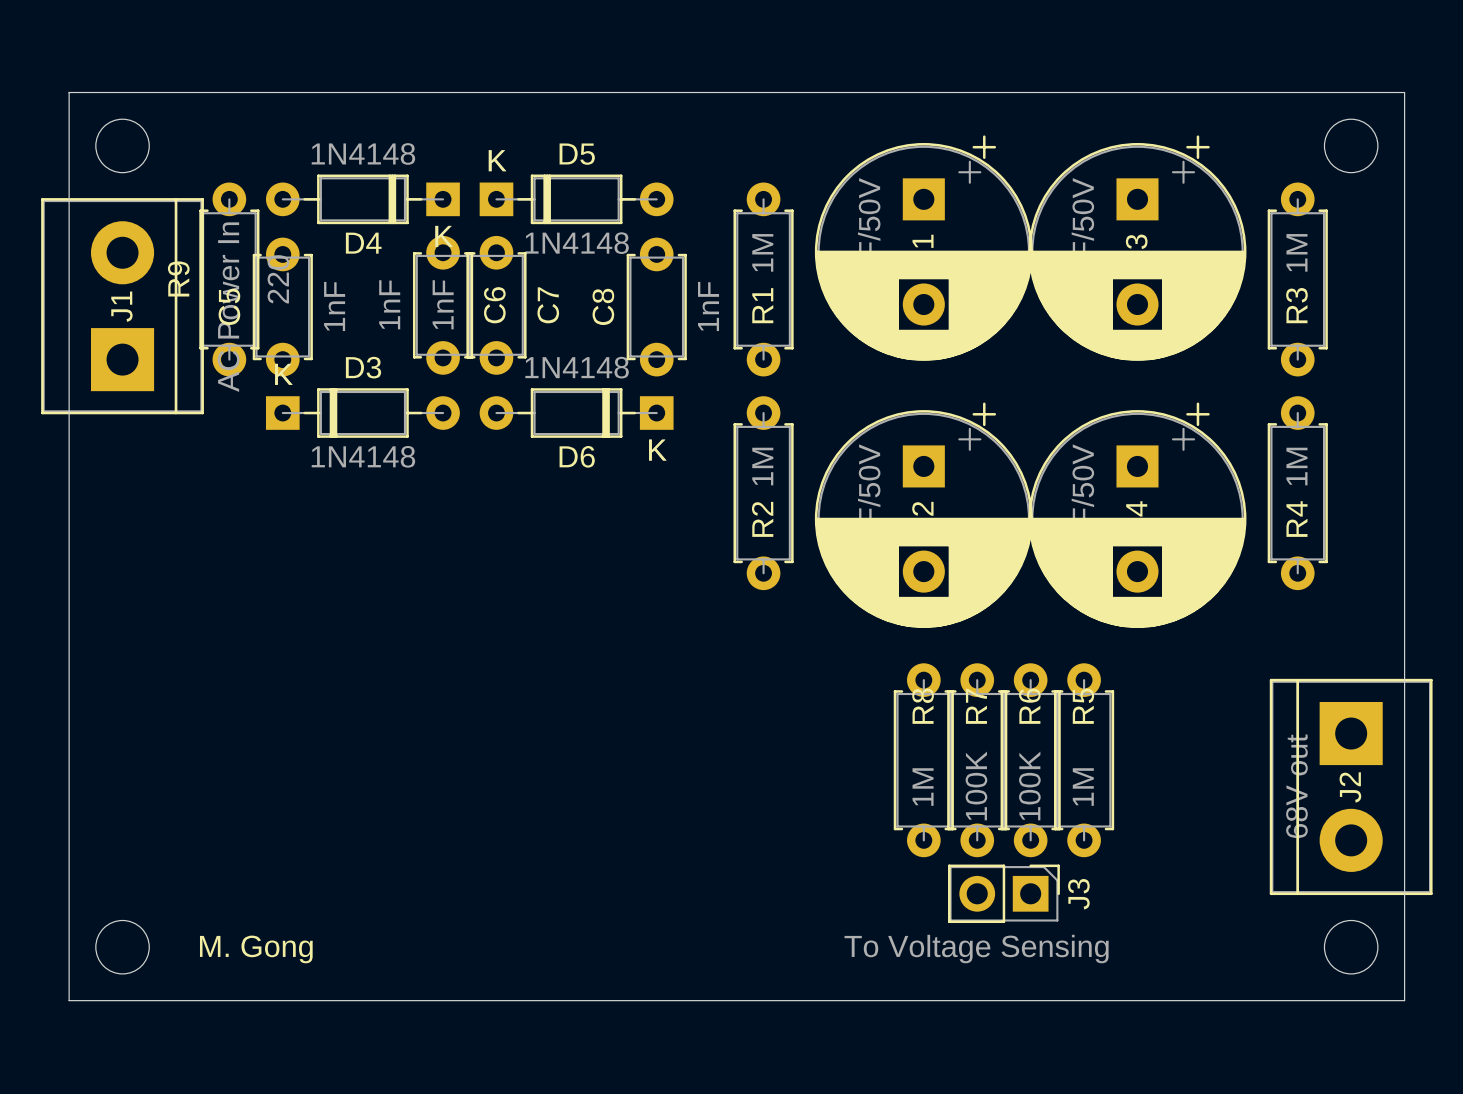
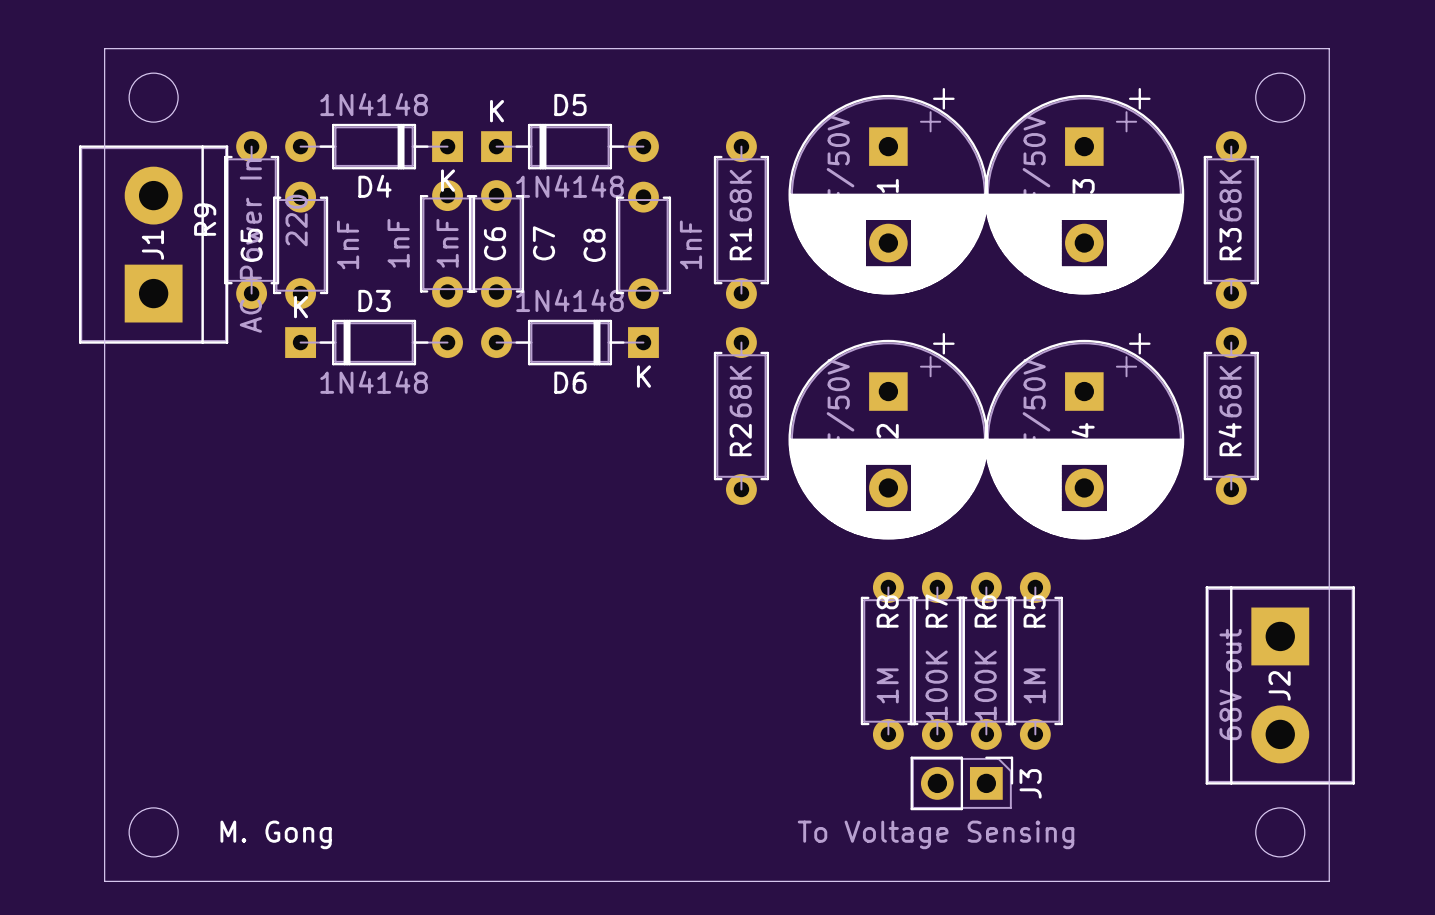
R1 value: 1M (762, 252) -> 68K (740, 195)
R3 value: 1M (1296, 252) -> 68K (1230, 195)
R2 value: 1M (762, 466) -> 68K (740, 391)
R4 value: 1M (1296, 466) -> 68K (1230, 391)

